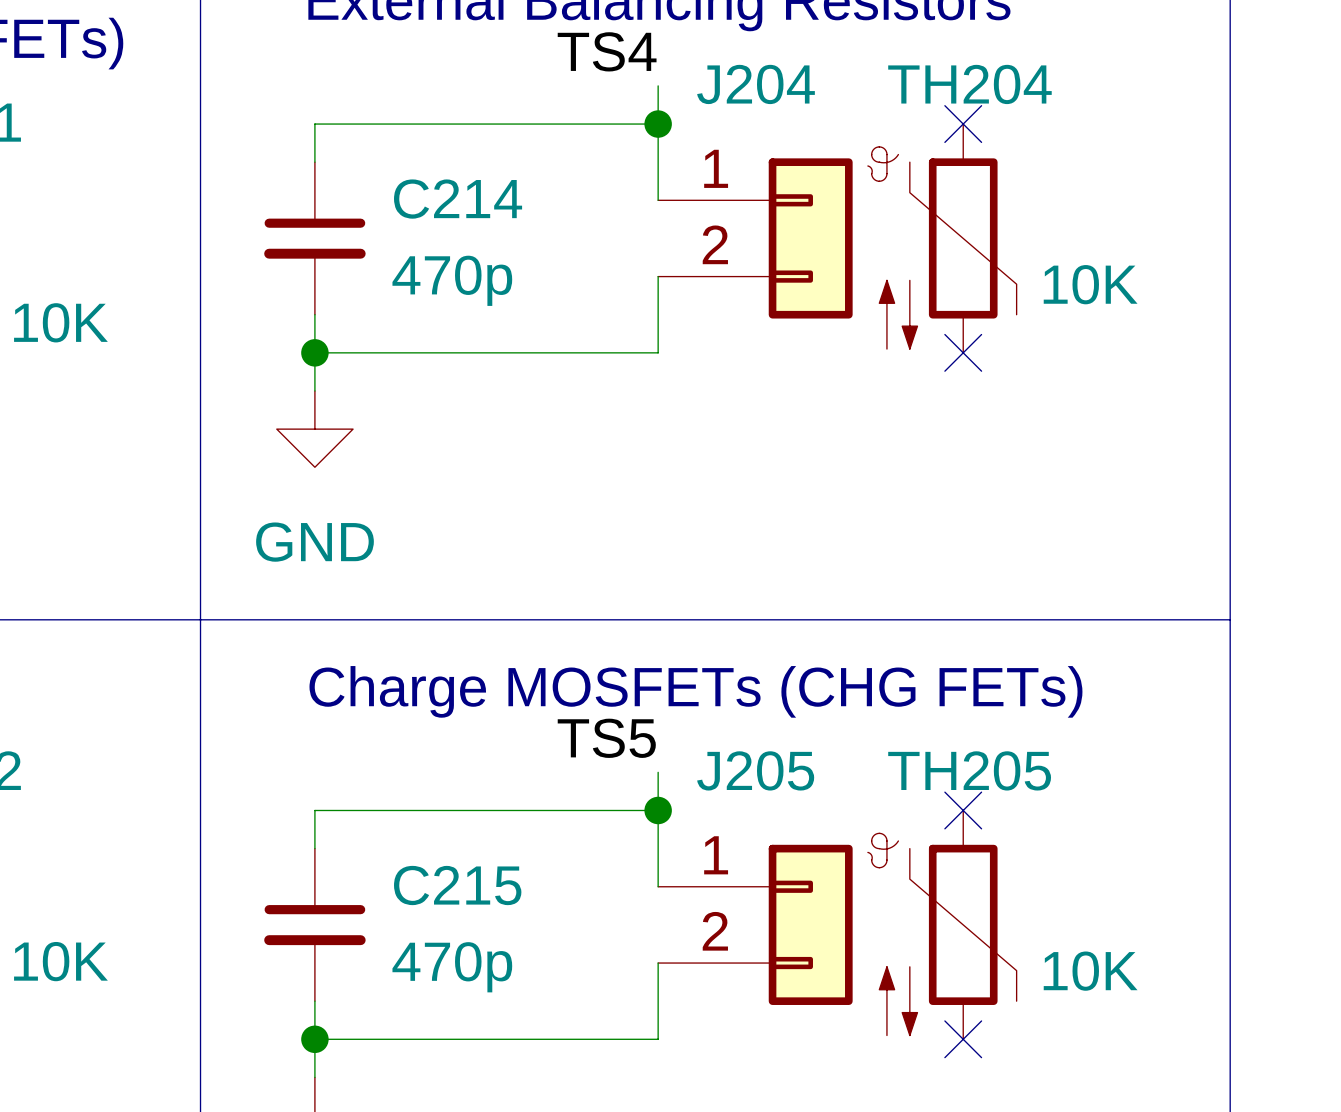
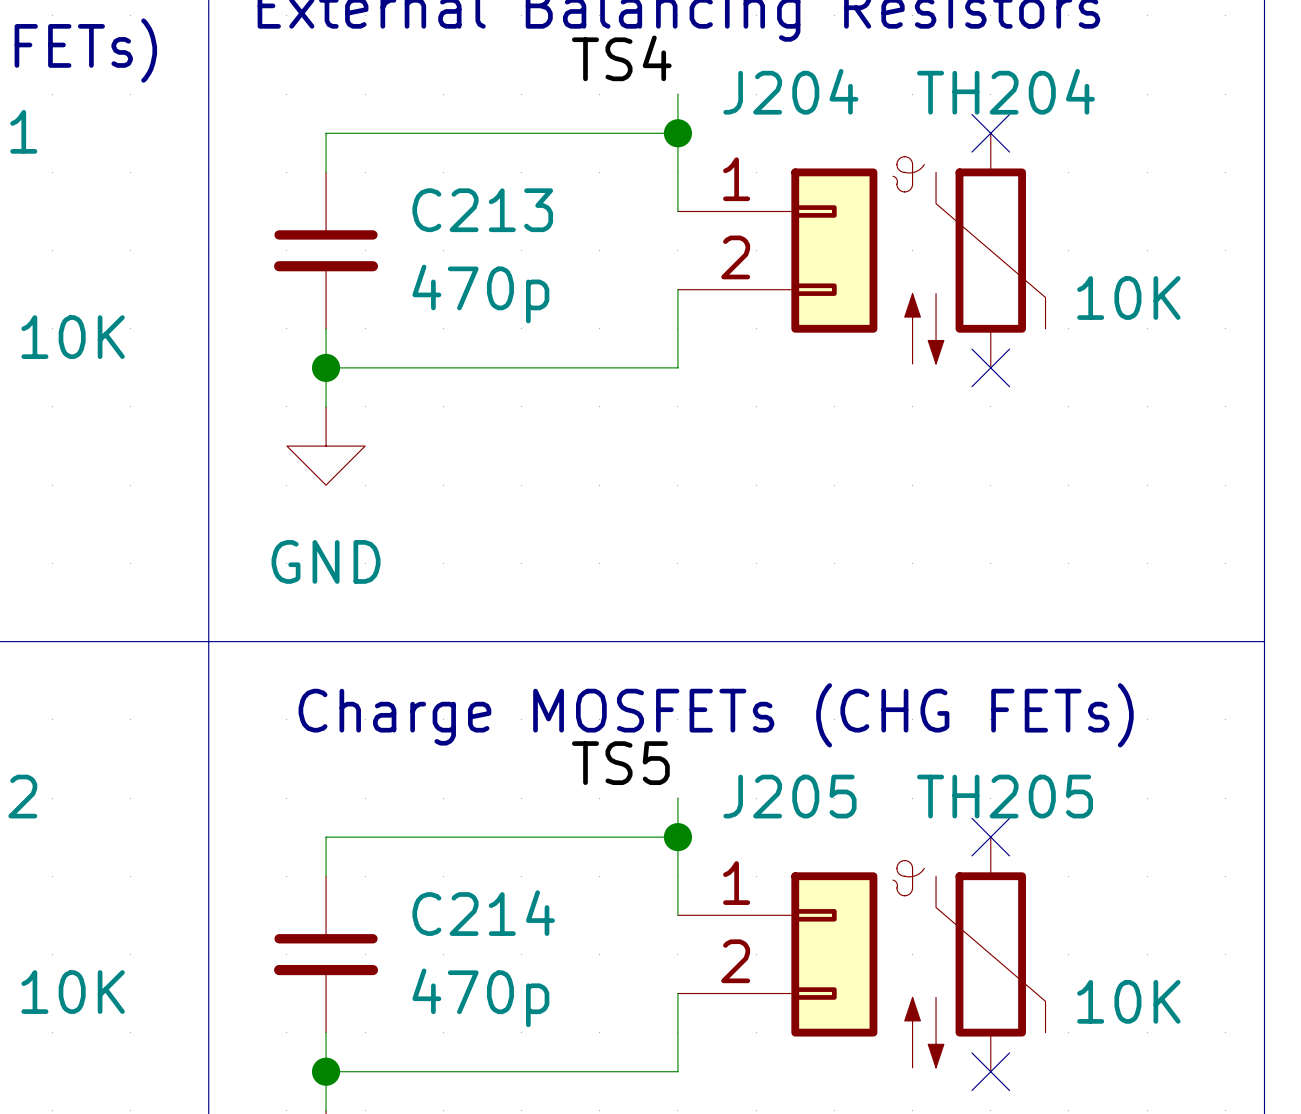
C214 name: C214 (458, 199) -> C213 (482, 210)
C215 name: C215 (457, 885) -> C214 (483, 913)

